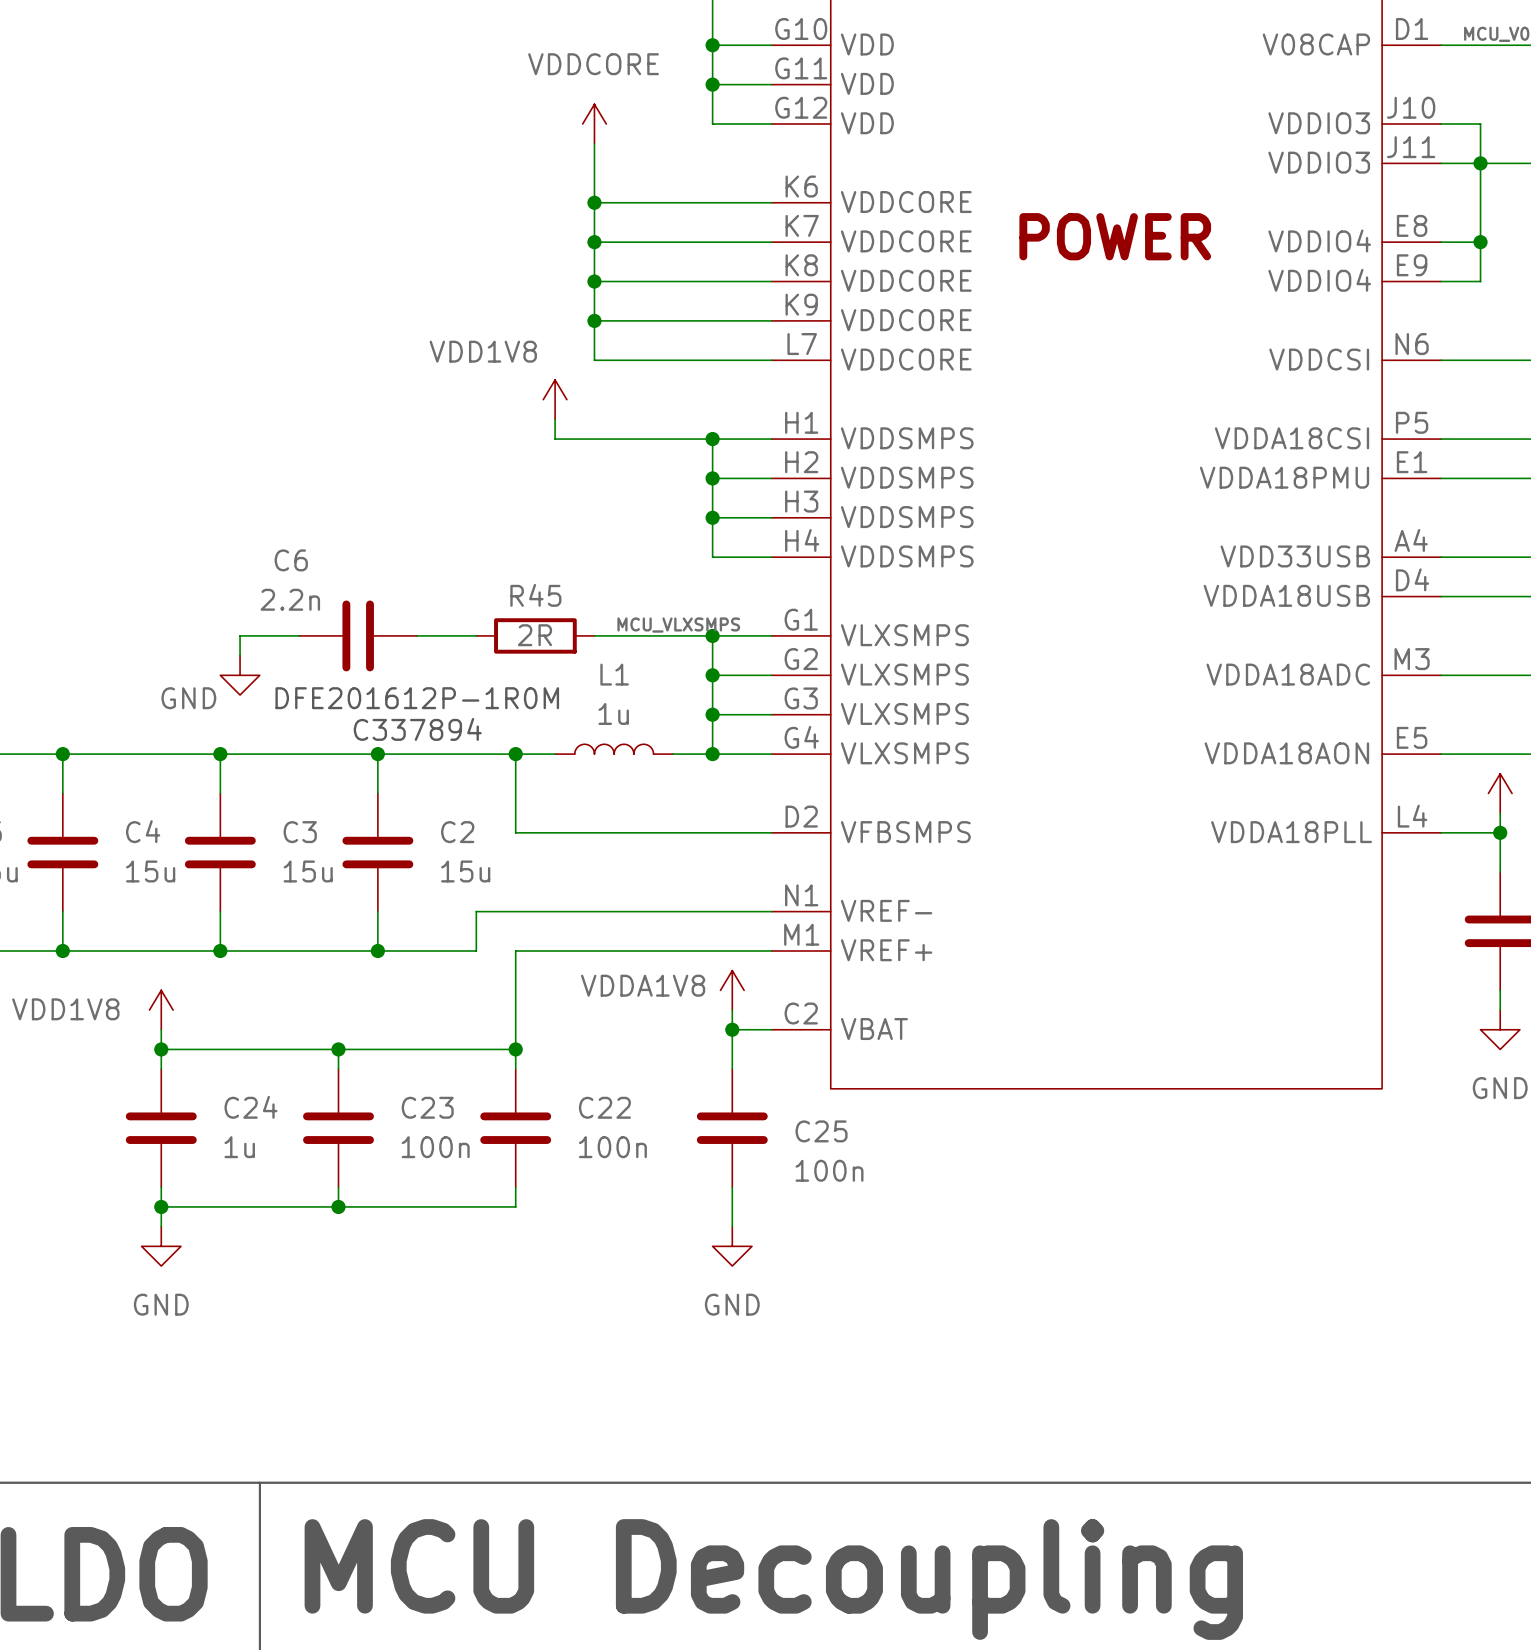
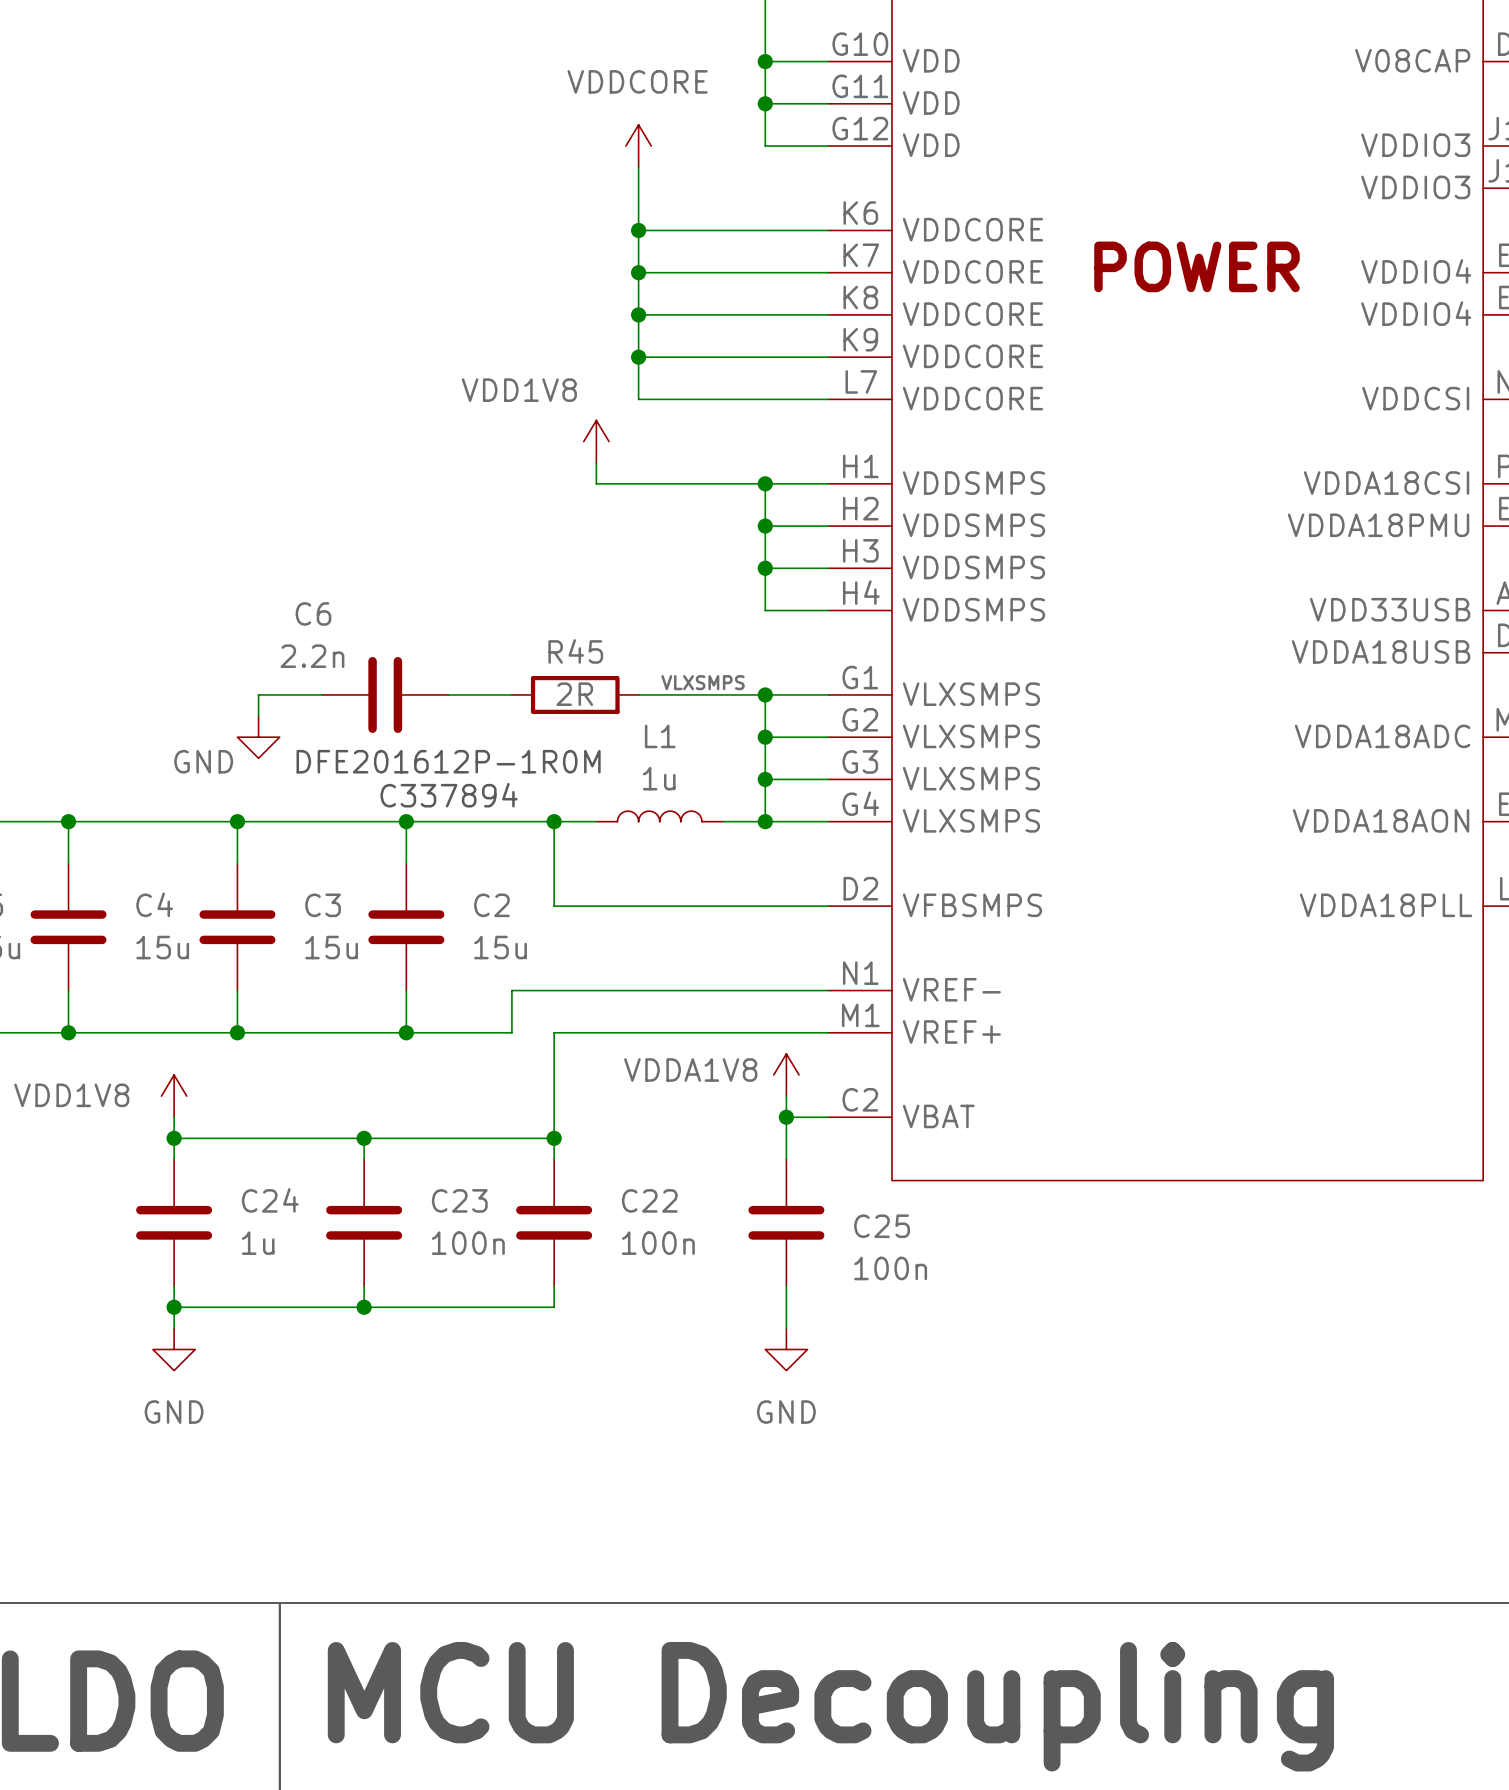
label: MCU_VLXSMPS (678, 625) -> VLXSMPS (703, 682)

